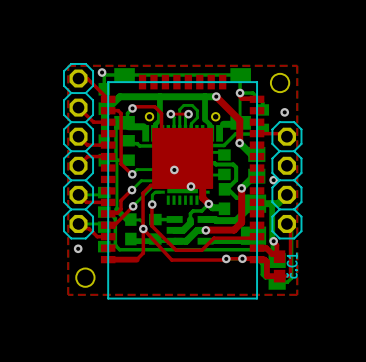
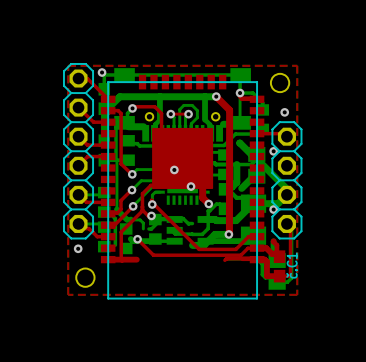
top track: (229, 110) (239, 120) (239, 143) -> (229, 110) (228, 234)
via: (239, 143) -> none
via: none -> (273, 151)
bottom track: none -> (257, 159) (286, 189) (286, 194)
bottom track: (233, 164) (236, 167) (236, 180) (226, 189) (224, 189) -> (257, 159) (251, 164) (236, 164) (236, 182) (232, 187) (224, 189)
via: (273, 180) -> none
top track: (241, 188) (241, 222) (234, 230) (205, 230) -> none
via: (241, 188) -> none
top track: (143, 193) (143, 228) -> (143, 193) (142, 210) (148, 215) (151, 215)
top track: (152, 204) (151, 226) (176, 250) (201, 250) (214, 238) (257, 236) -> (151, 200) (199, 249) (235, 249) (248, 236) (257, 236)
bottom track: (272, 204) (273, 240) -> none
top track: none -> (142, 206) (142, 210) (121, 232) (122, 259)
bottom track: (224, 208) (212, 207) (208, 204) (201, 210) (193, 210) (190, 213) (190, 223) (183, 230) (174, 230) -> (224, 208) (219, 204) (216, 204) (208, 210) (208, 228) (202, 234) (175, 234) (171, 228)
via: none -> (273, 209)
part footprint: [125, 213, 137, 246] -> [119, 223, 133, 255]
via: none -> (151, 215)
bottom track: none -> (192, 223) (188, 223) (183, 218) (161, 218) (151, 229) (148, 228)
top track: (143, 228) (143, 253) (136, 259) -> none
top track: (143, 228) (171, 260) (225, 260) -> none
via: (143, 228) -> none
bottom track: (205, 230) (197, 230) (186, 241) (174, 241) -> none
via: (205, 230) -> none
bottom track: none -> (228, 234) (214, 234) (203, 245) (192, 245)
via: none -> (228, 234)
top track: none -> (137, 239) (153, 255) (241, 255) (247, 248) (257, 248)
via: none -> (137, 239)
via: (273, 241) -> none
bottom track: (104, 246) (115, 245) (119, 249) (271, 249) (273, 256) -> none
via: (226, 258) -> none
via: (242, 258) -> none

